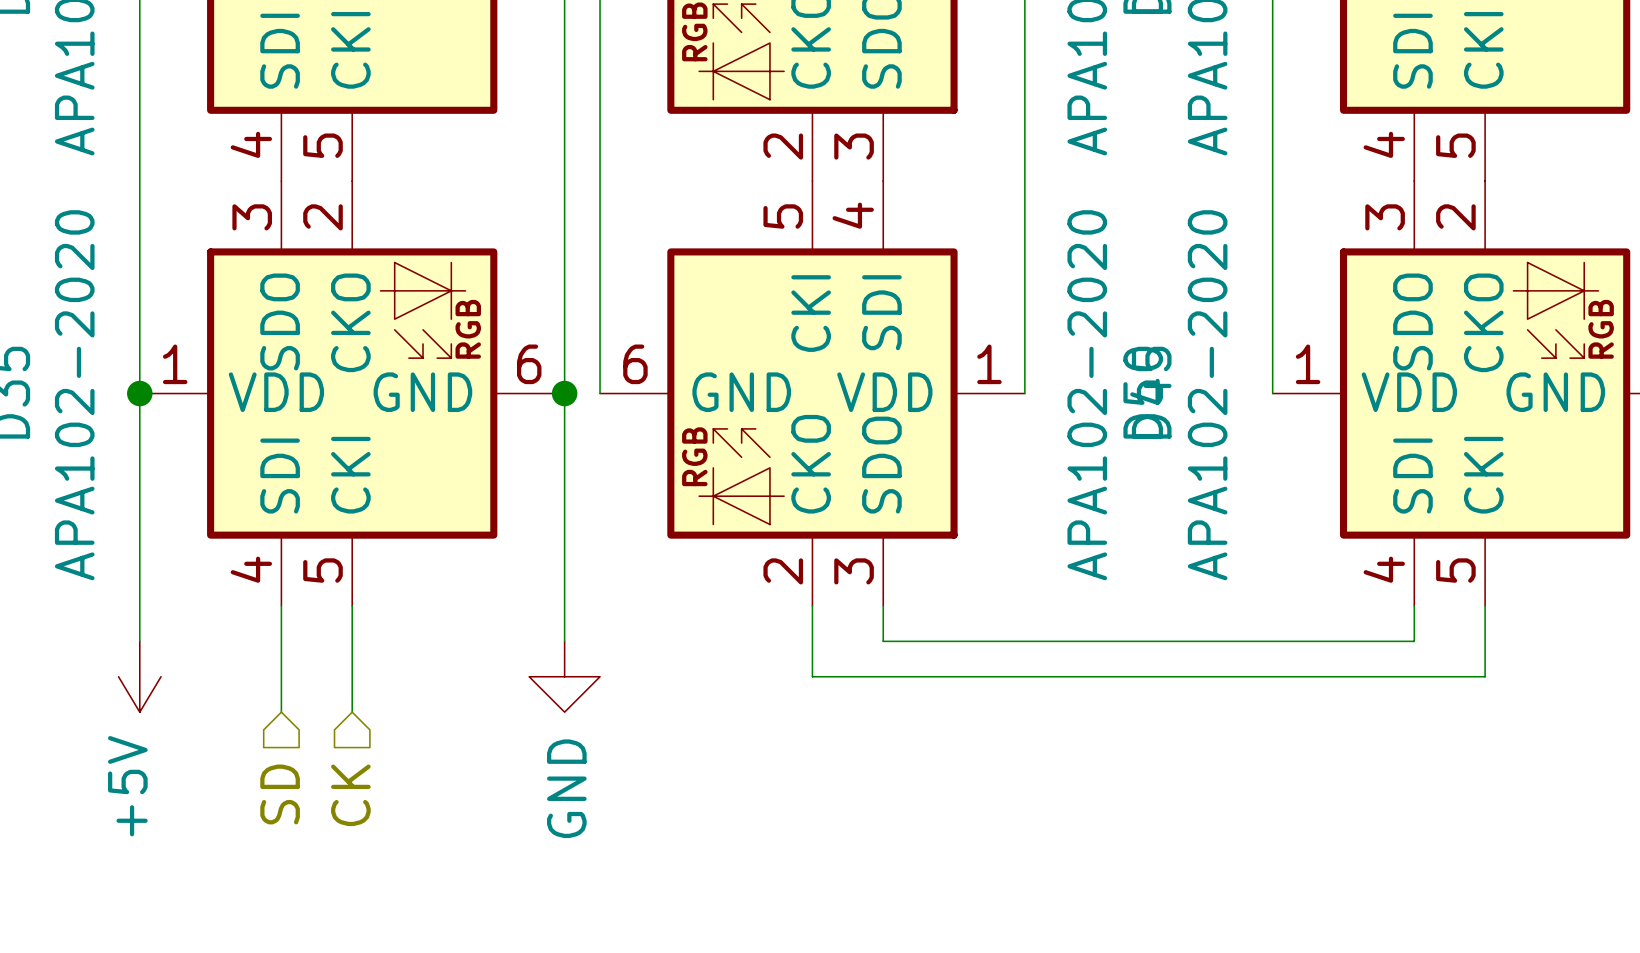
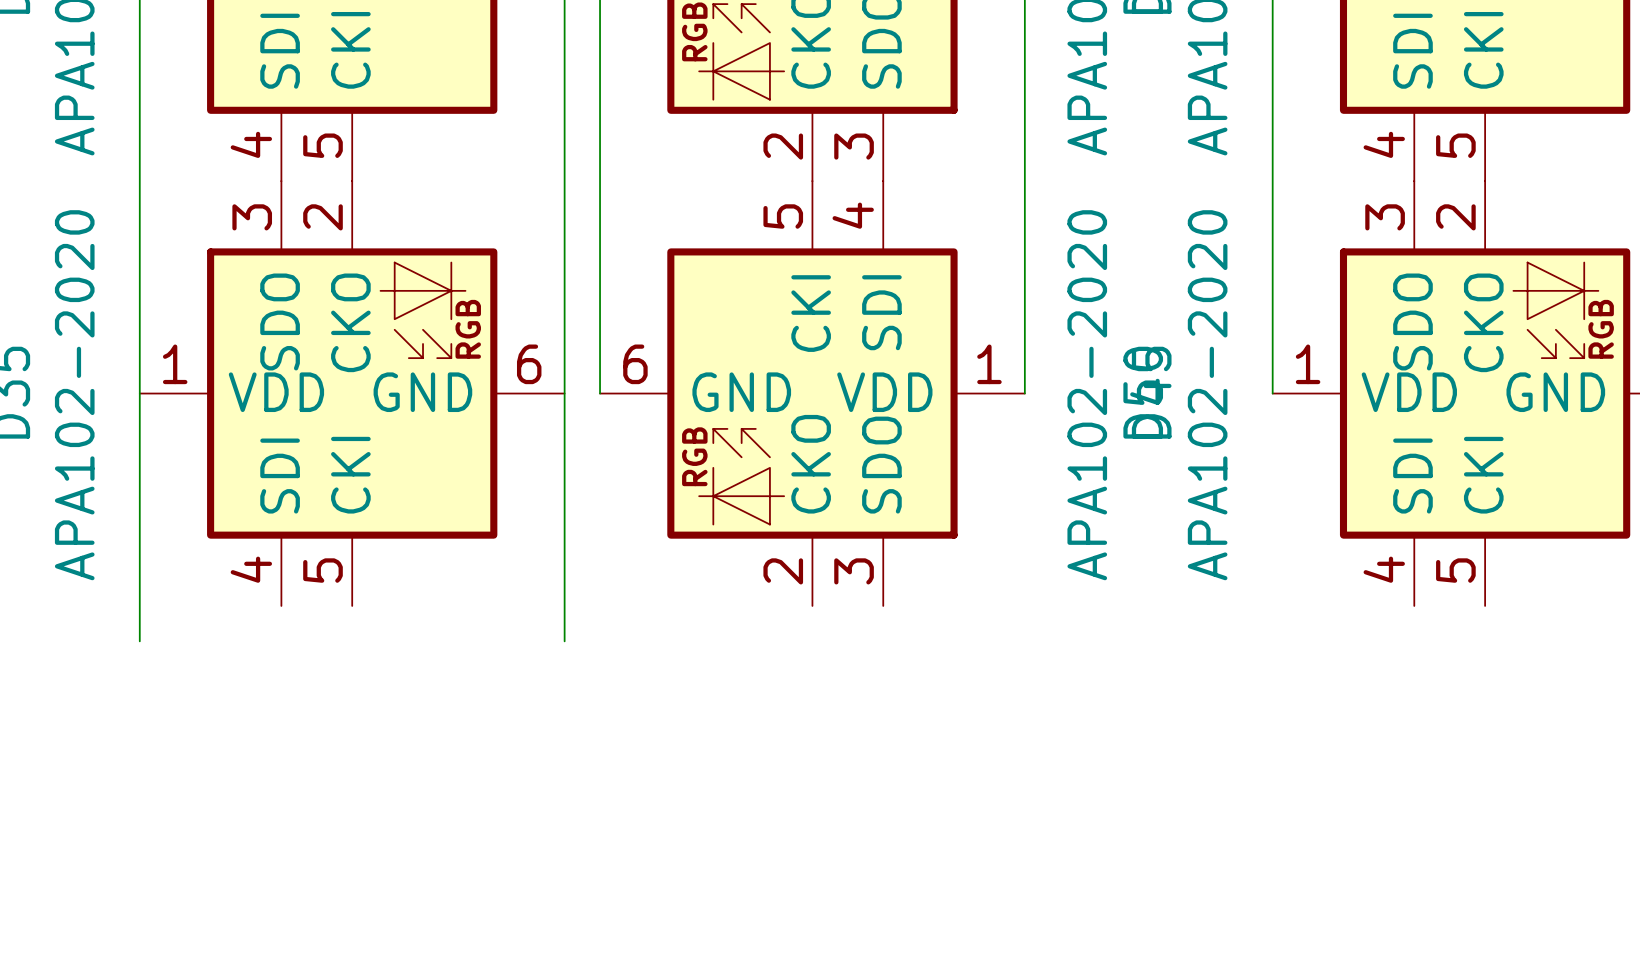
junction: (139, 393) -> none
junction: (564, 393) -> none
wire: (281, 605) (281, 712) -> none
wire: (352, 605) (352, 712) -> none
wire: (812, 605) (812, 676) (1485, 676) (1485, 605) -> none
wire: (883, 605) (883, 641) (1414, 641) (1414, 605) -> none
power symbol: +5V (139, 676) -> none
power symbol: GND (564, 676) -> none
hierarchical label: SD (280, 794) -> none
hierarchical label: CK (350, 795) -> none

